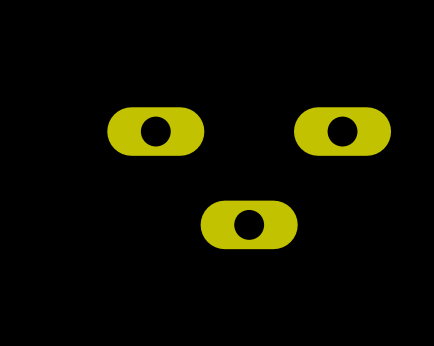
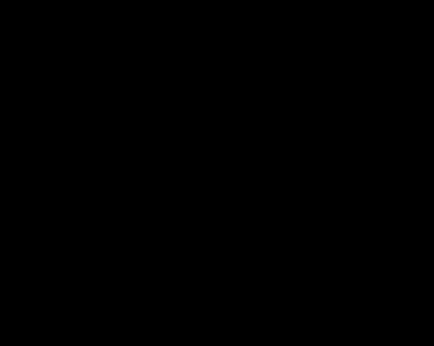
part: (249, 178) -> none

